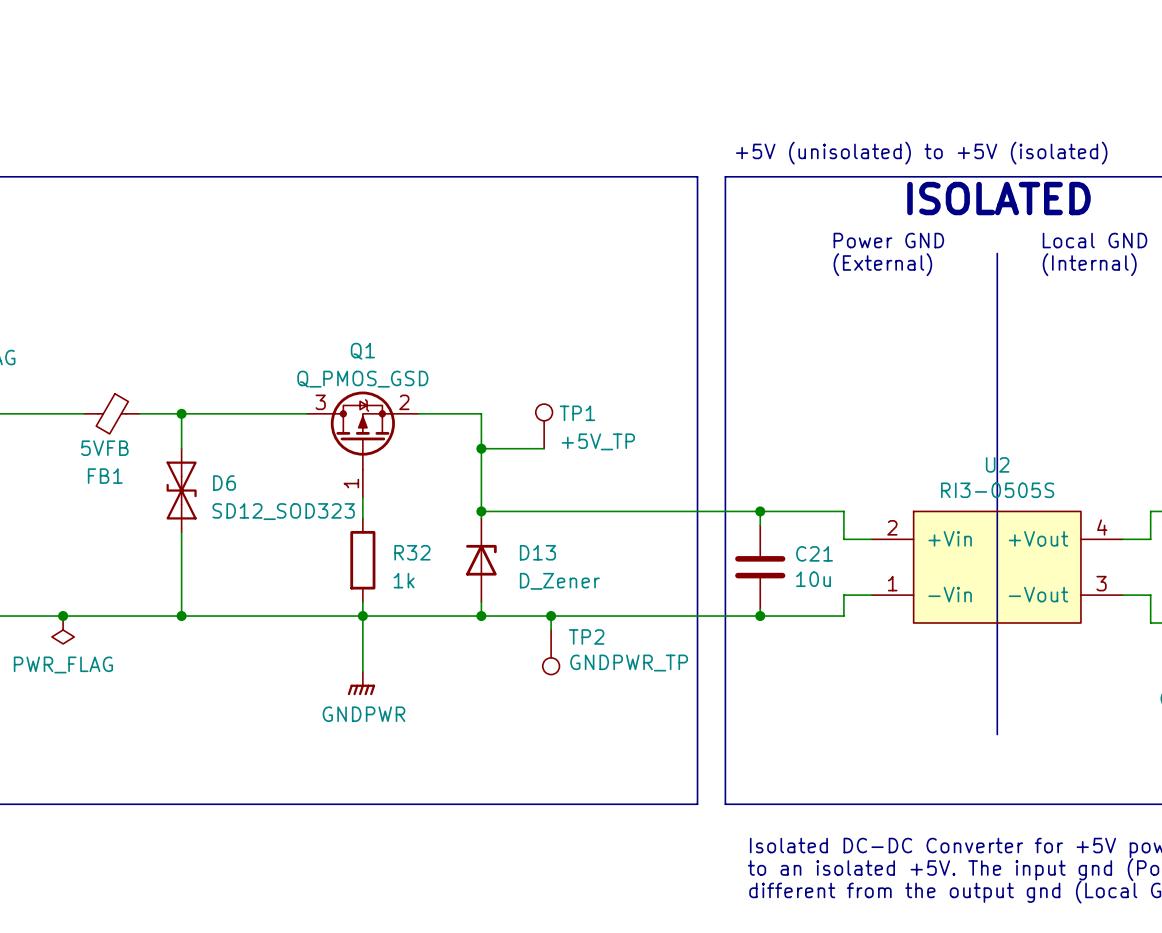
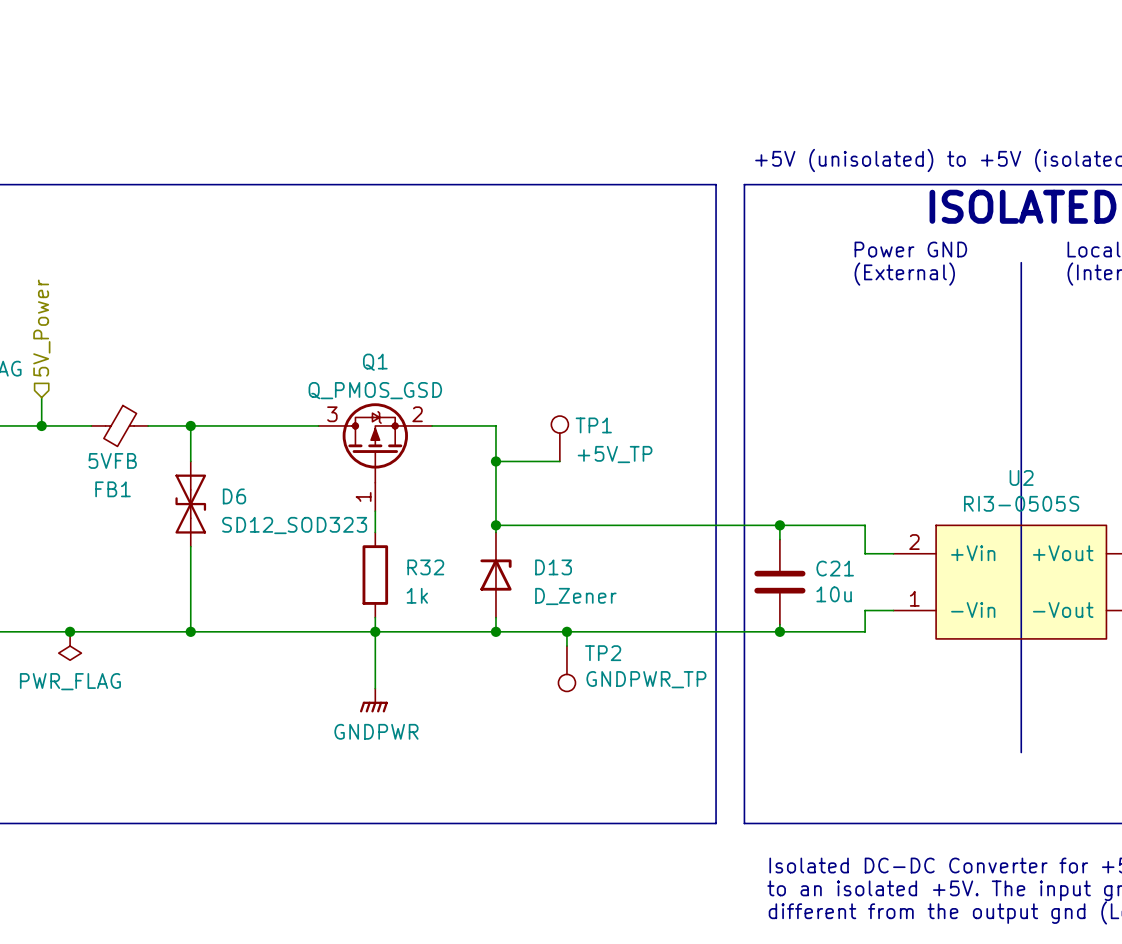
hierarchical label: none -> 5V_Power (41, 328)
wire: none -> (41, 397) (41, 425)
junction: none -> (41, 425)

